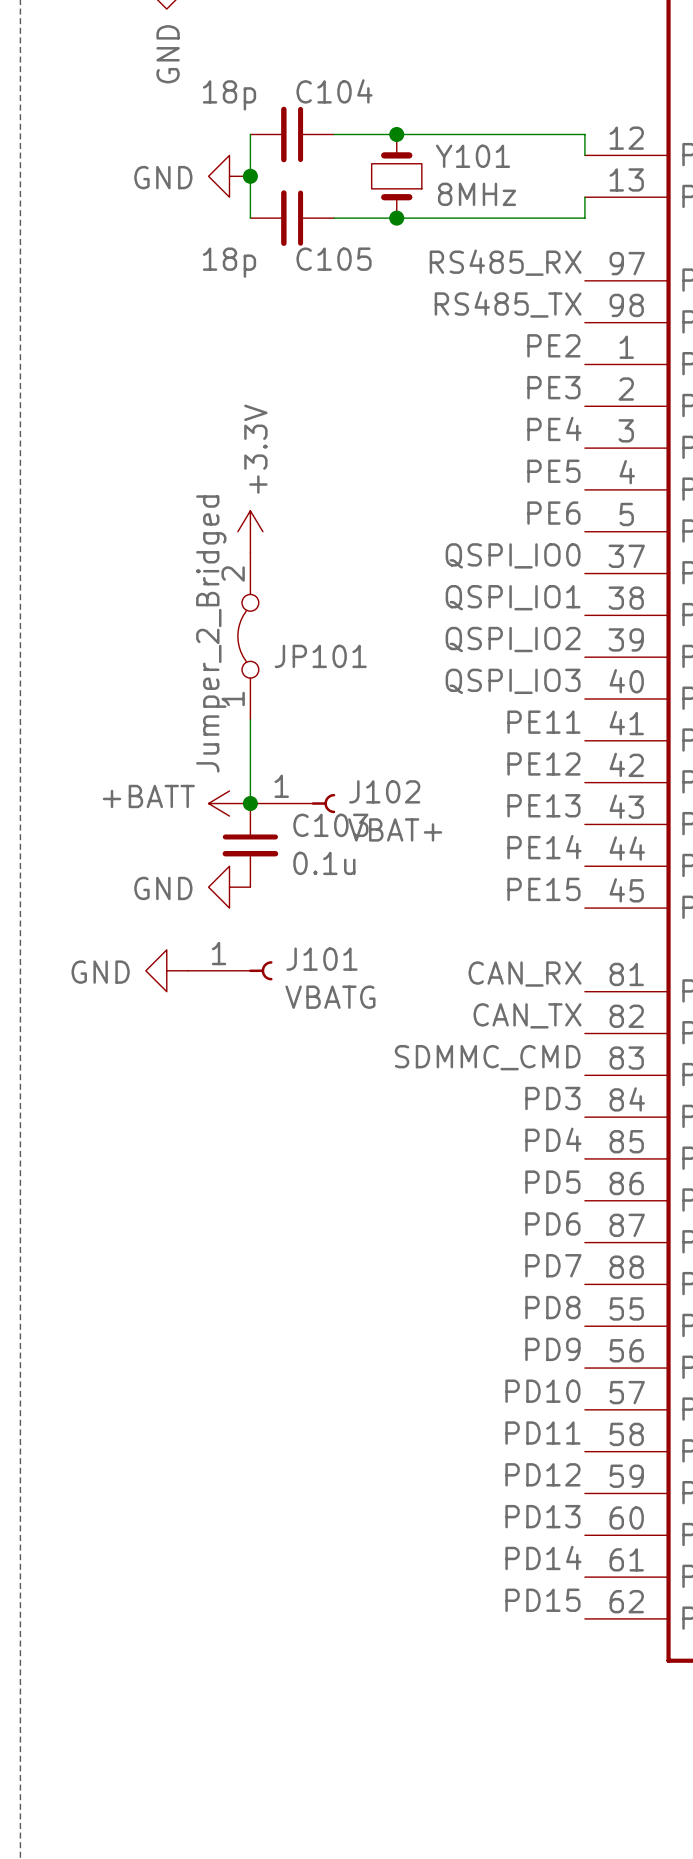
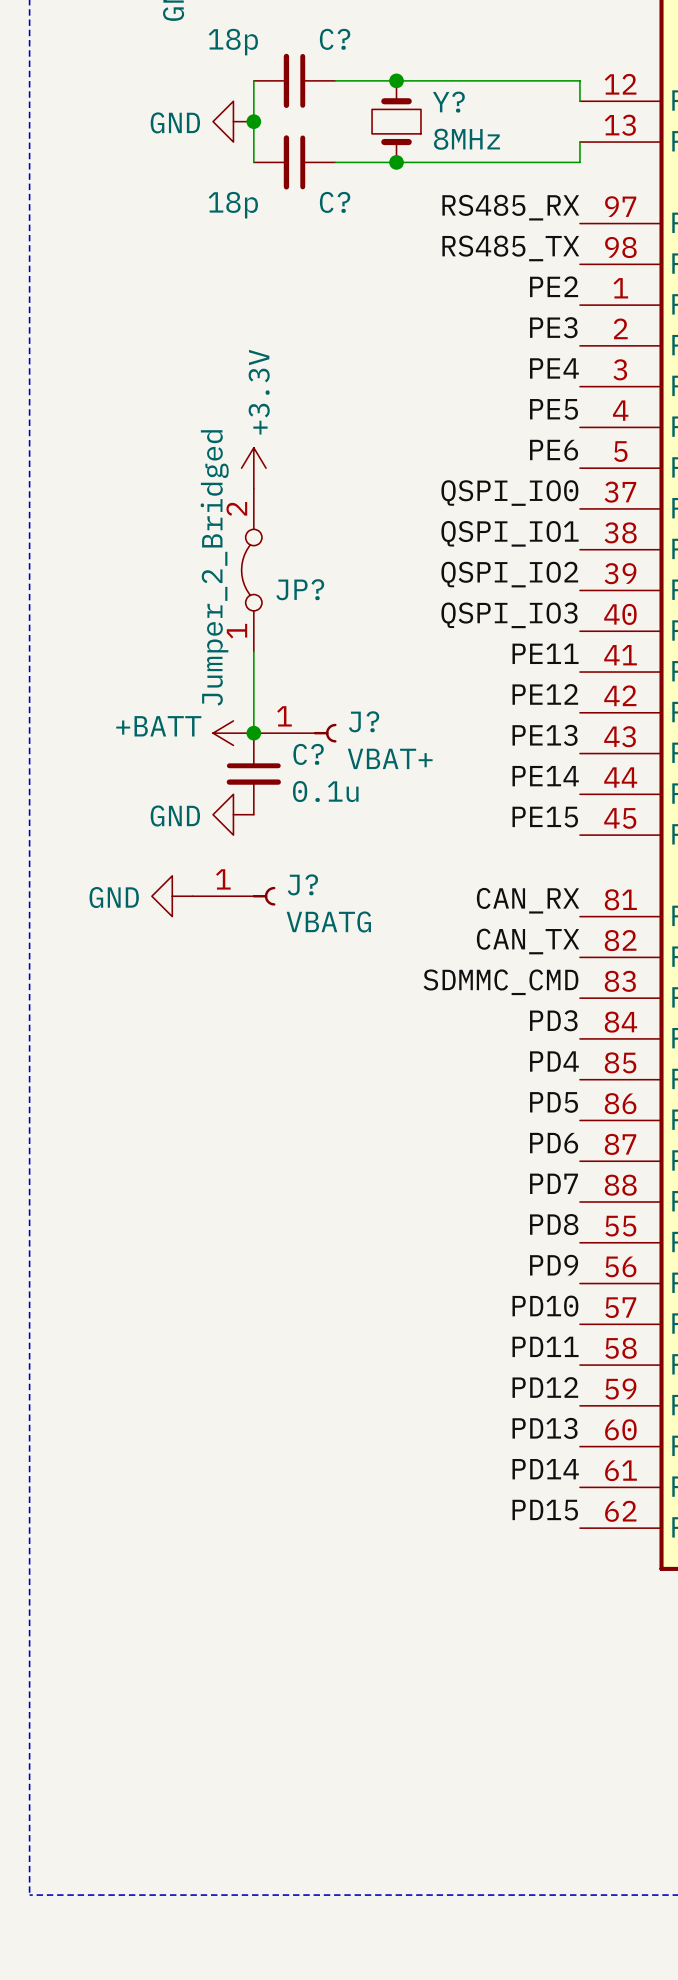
C104 name: C104 (334, 91) -> C? (335, 39)
Y101 name: Y101 (473, 156) -> Y? (448, 102)
C105 name: C105 (334, 259) -> C? (335, 202)
JP101 name: JP101 (320, 656) -> JP? (300, 589)
J102 name: J102 (384, 791) -> J? (364, 721)
C103 name: C103 (330, 825) -> C? (308, 754)
J101 name: J101 (322, 959) -> J? (302, 884)

